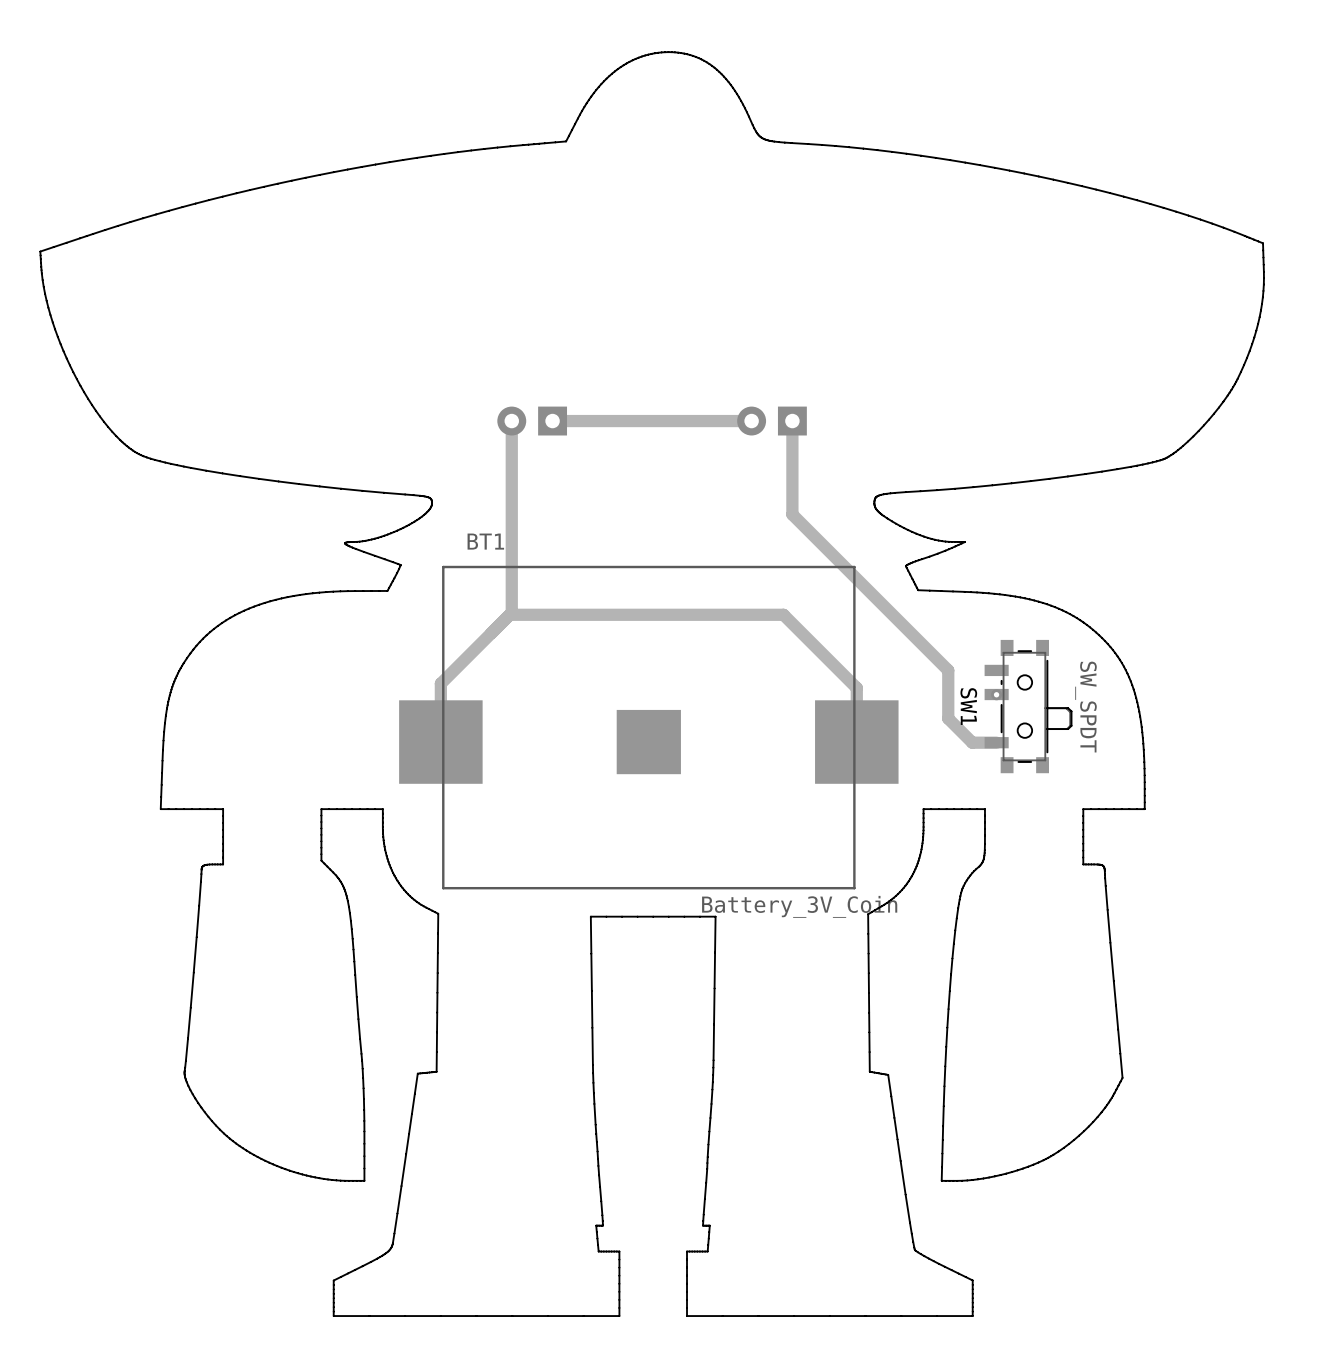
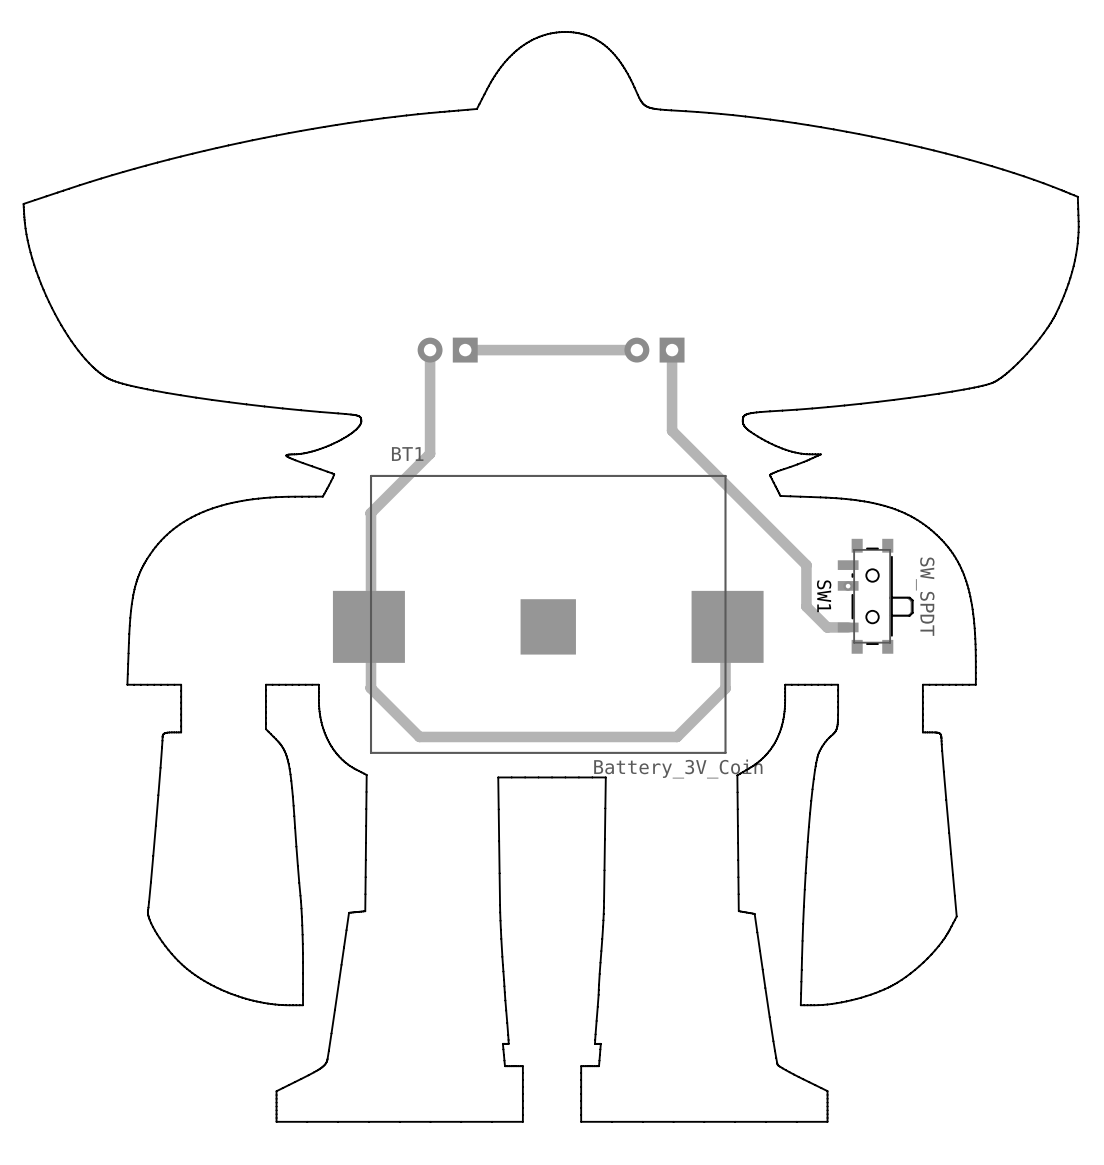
track: (511, 541) (511, 612) (440, 683) (440, 742) -> (430, 453) (370, 513) (370, 688) (419, 736) (677, 736) (725, 688) (725, 626)
track: (509, 614) (783, 614) (856, 688) (856, 742) -> none

